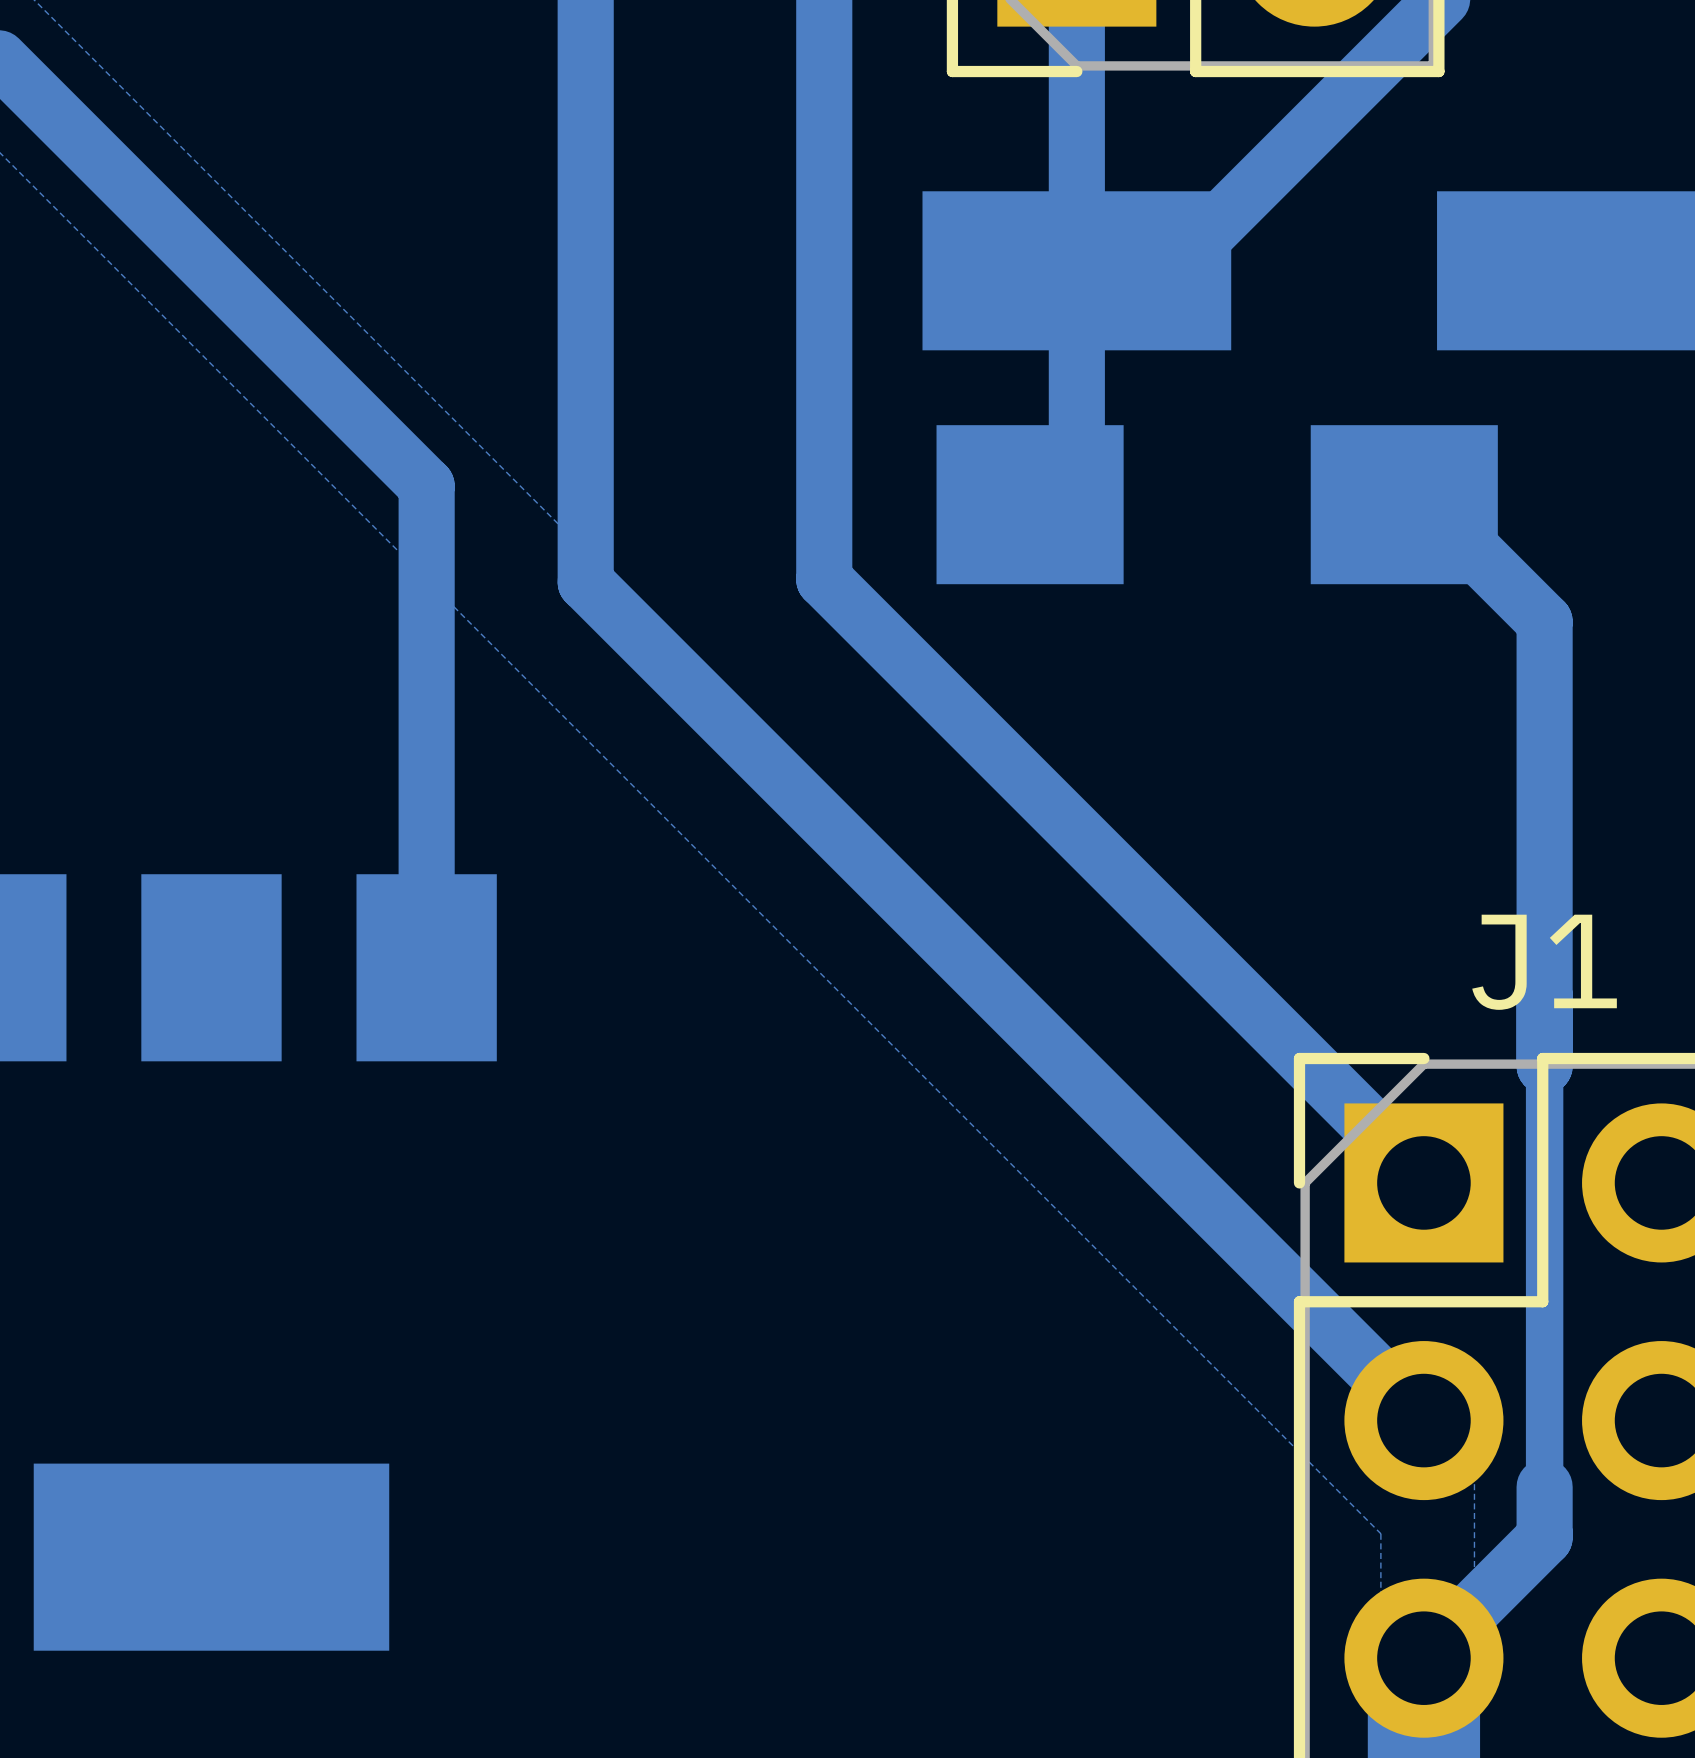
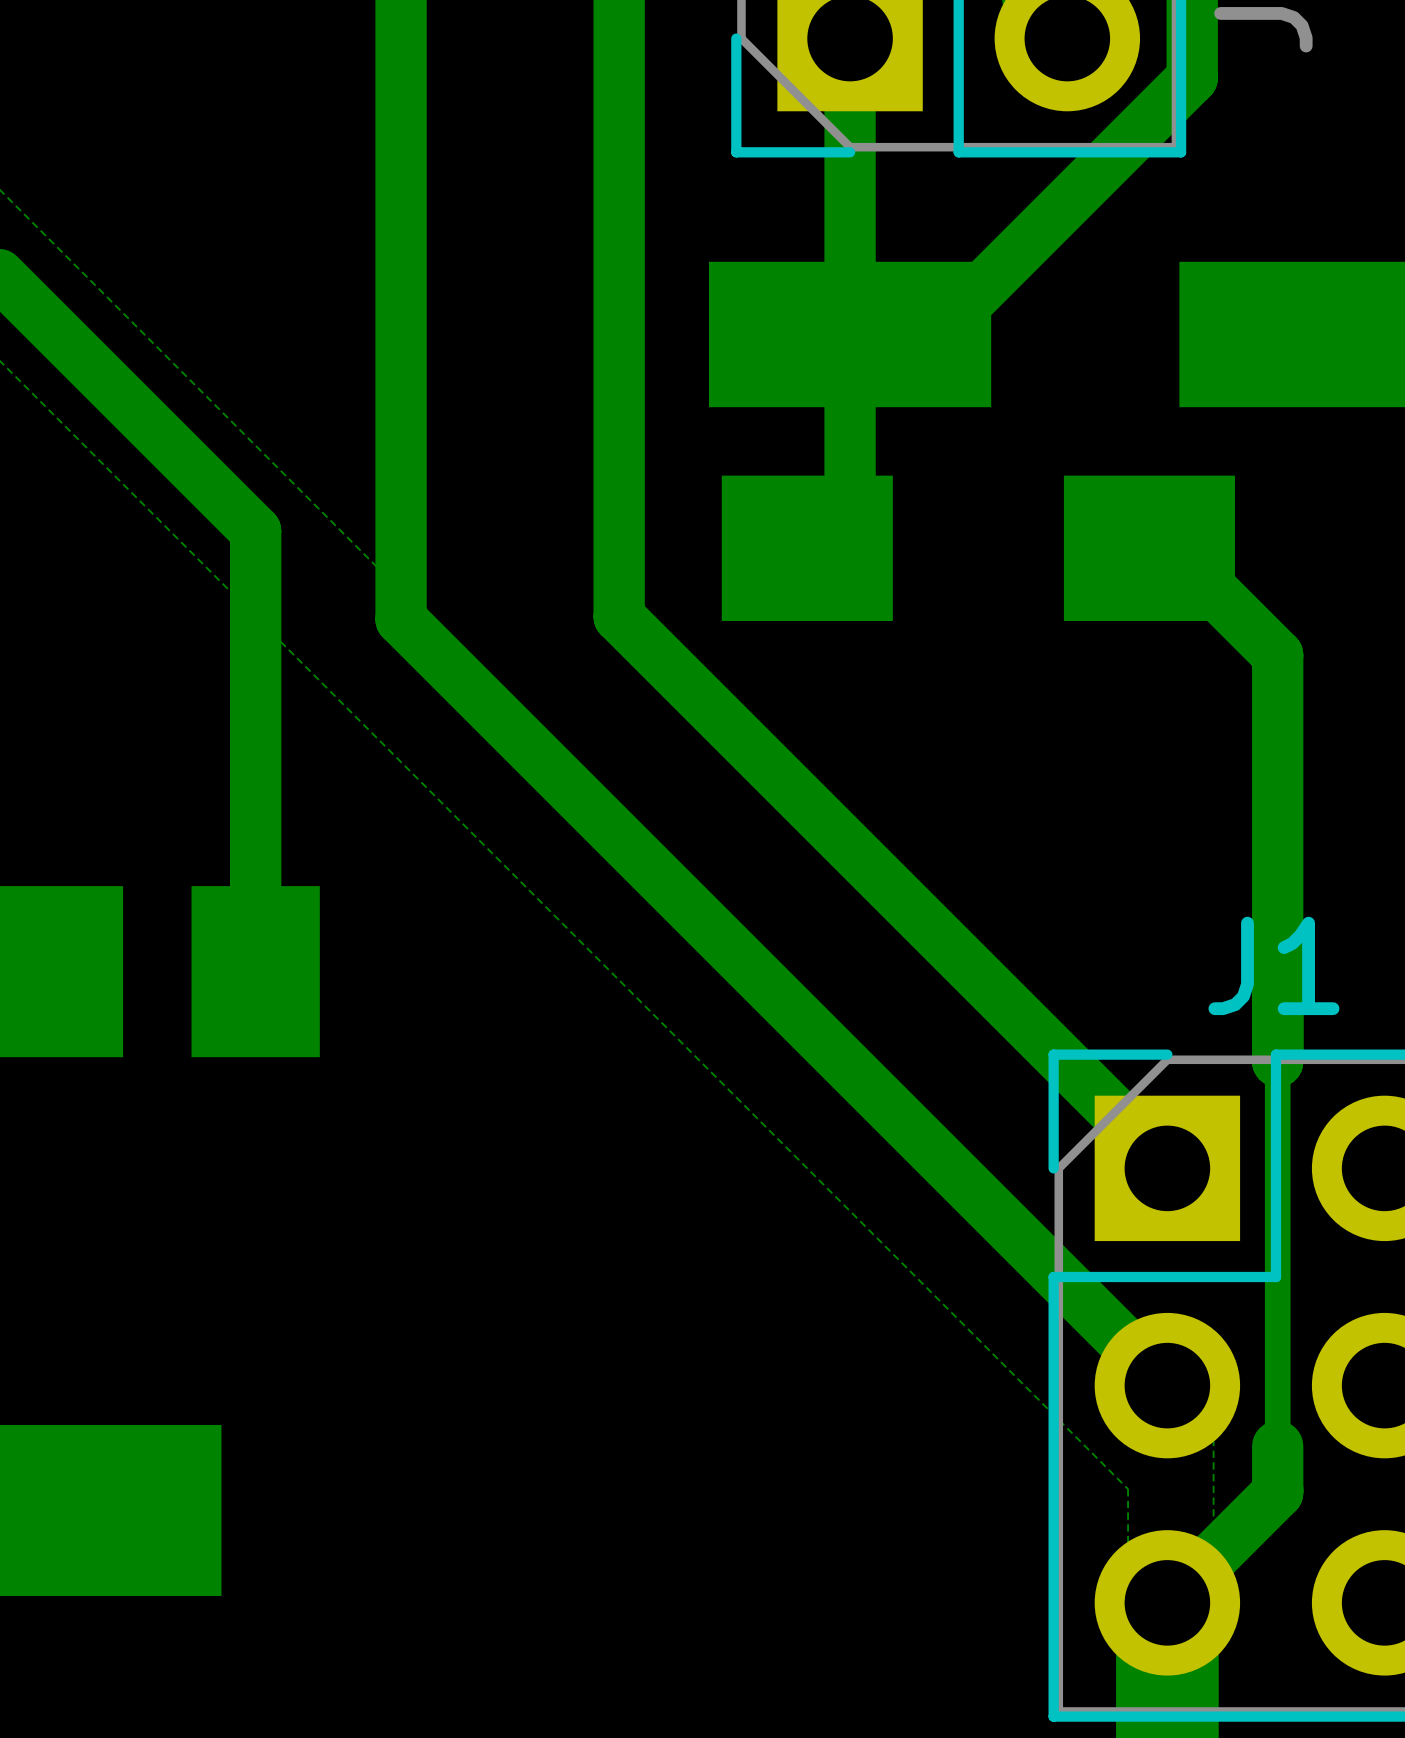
bottom track width: thick (1544, 995) (1544, 1486) -> thin (1277, 997) (1277, 1446)

